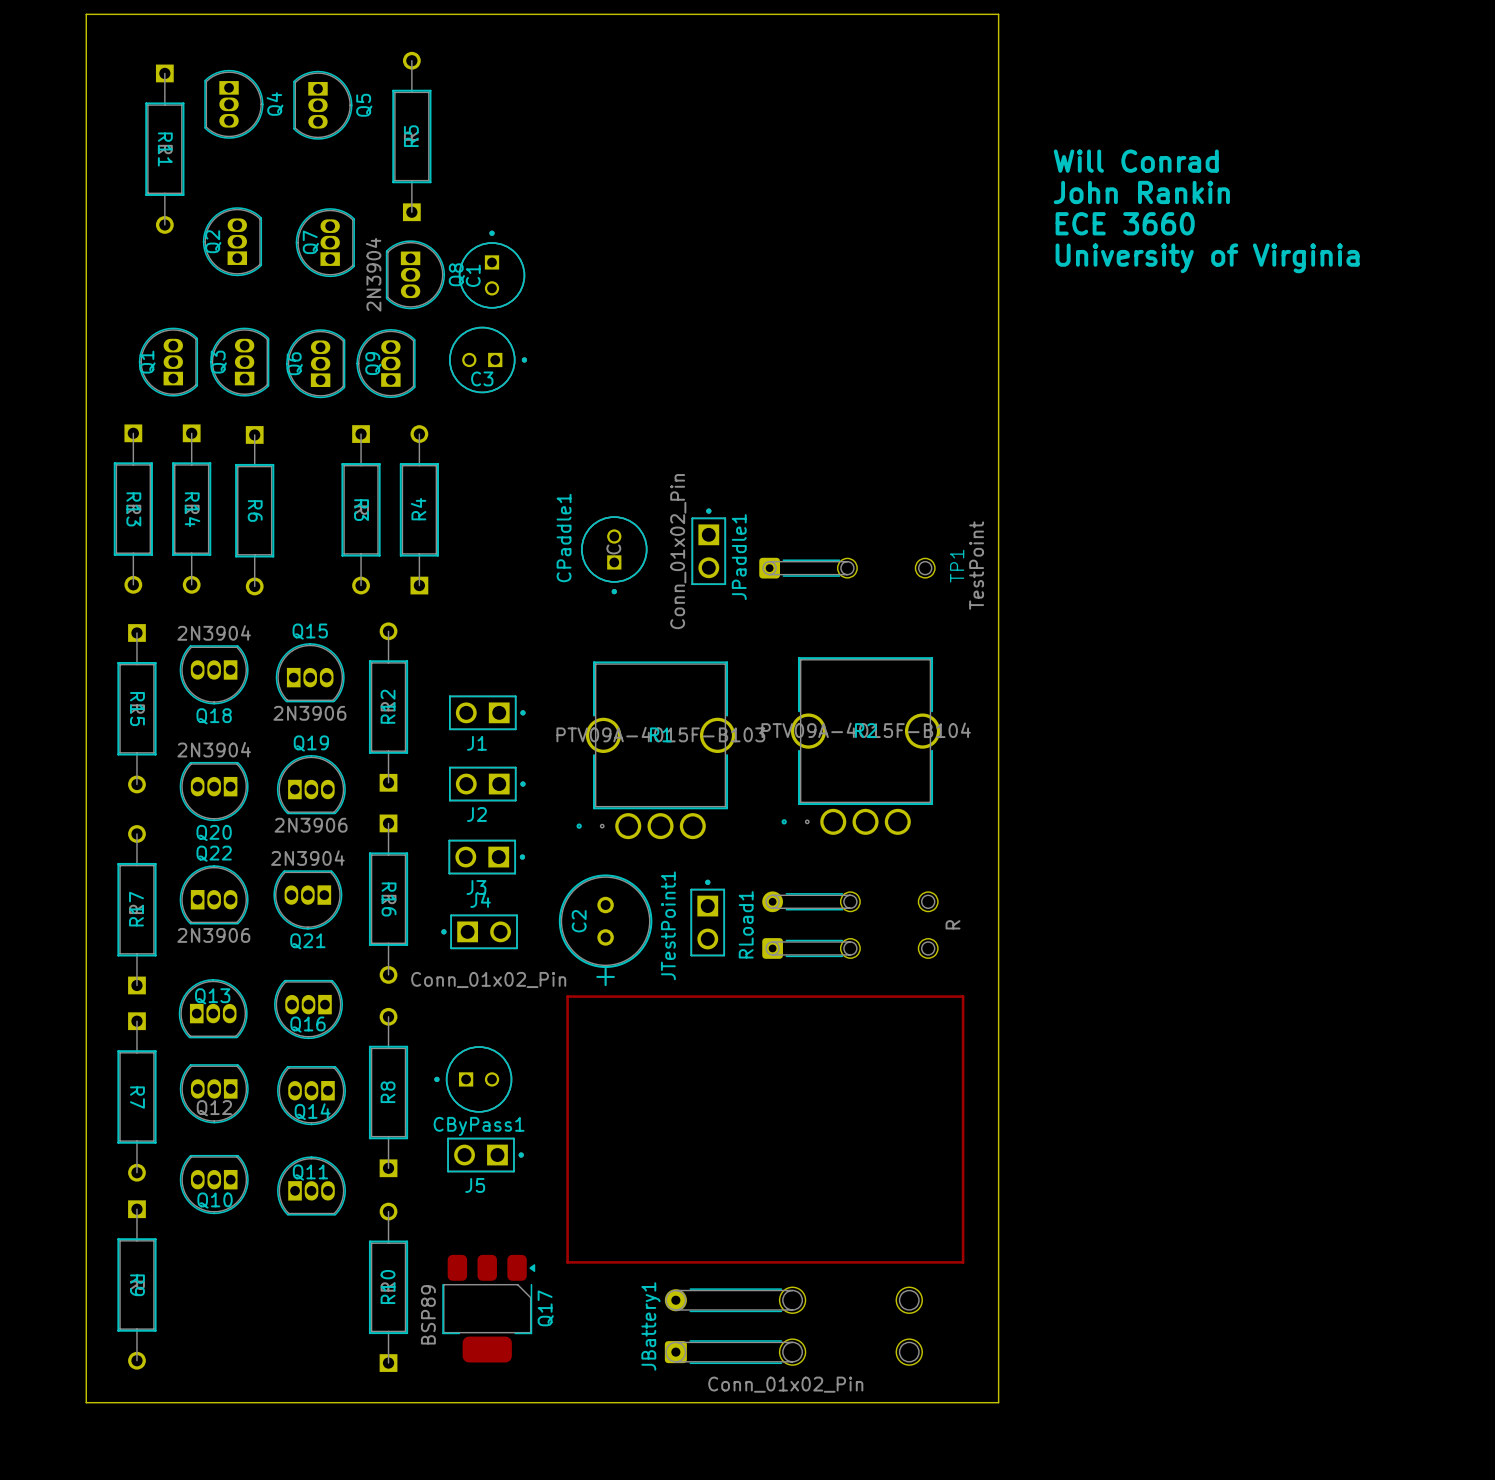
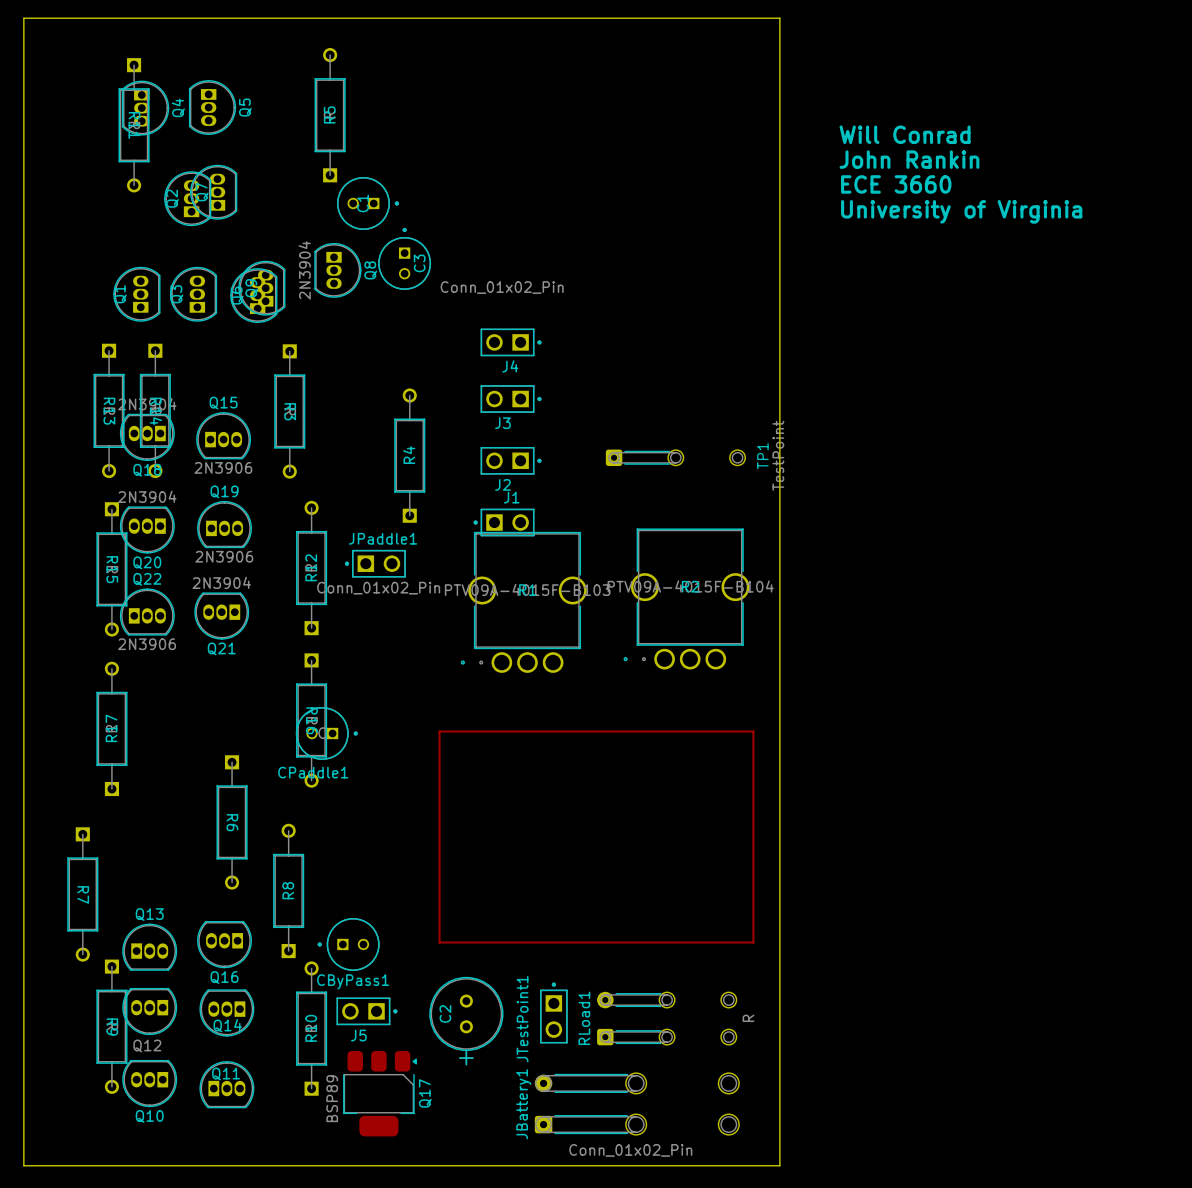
board edge: (86, 14) (86, 1402) (998, 1402) (998, 14) (978, 14) -> (71, 18) (23, 18) (23, 1165) (779, 1165) (779, 18)
Q4 position: (233, 104) -> (145, 108)
Q5 position: (322, 105) -> (212, 107)
Q7 position: (325, 242) -> (213, 192)
C1 rotation: 0° (492, 269) -> 90° clockwise (368, 203)
Q8 position: (415, 274) -> (337, 270)
C3 rotation: 0° (488, 359) -> 90° counterclockwise (404, 258)
Q9 position: (386, 363) -> (261, 288)
R4 position: (419, 509) -> (409, 455)
R6 position: (254, 510) -> (232, 822)
JPaddle1 rotation: 0° (708, 546) -> 90° counterclockwise (375, 563)
JPaddle1 position: (708, 546) -> (375, 563)
CPaddle1 rotation: 0° (614, 555) -> 90° counterclockwise (326, 733)
CPaddle1 position: (614, 555) -> (326, 733)
Q15 position: (310, 672) -> (223, 435)
Q18 position: (214, 674) -> (147, 437)
J1 rotation: 0° (487, 712) -> 180° (503, 522)
J1 position: (487, 712) -> (503, 522)
Q19 position: (311, 784) -> (224, 524)
J2 position: (487, 784) -> (511, 460)
Q20 position: (214, 791) -> (147, 530)
J3 position: (486, 857) -> (511, 399)
Q22 position: (214, 894) -> (147, 612)
Q21 position: (307, 899) -> (221, 616)
JTestPoint1 position: (707, 918) -> (553, 1012)
RLoad1 position: (850, 925) -> (666, 1018)
C2 position: (605, 930) -> (466, 1021)
J4 rotation: 0° (479, 931) -> 180° (511, 342)
J4 position: (479, 931) -> (511, 342)
Q13 name position: Q13 (212, 996) -> Q13 (149, 914)
top track: (567, 996) (963, 996) (963, 1262) (567, 1262) (567, 996) -> (439, 731) (753, 731) (753, 942) (439, 942) (439, 731)
Q13 position: (213, 1008) -> (149, 947)
Q16 position: (308, 1009) -> (224, 944)
Q16 name position: Q16 (308, 1024) -> Q16 (224, 977)
CByPass1 position: (473, 1079) -> (348, 944)
R8 position: (388, 1092) -> (288, 890)
Q12 position: (214, 1093) -> (149, 1011)
Q14 position: (311, 1095) -> (226, 1012)
R7 position: (136, 1096) -> (82, 894)
Q12 name position: Q12 (214, 1108) -> Q12 (147, 1045)
J5 position: (485, 1155) -> (367, 1011)
Q10 position: (214, 1184) -> (149, 1083)
Q11 position: (311, 1185) -> (226, 1084)
Q10 name position: Q10 (215, 1200) -> Q10 (149, 1116)
Q17 position: (488, 1308) -> (380, 1093)
JBattery1 position: (793, 1326) -> (636, 1104)

